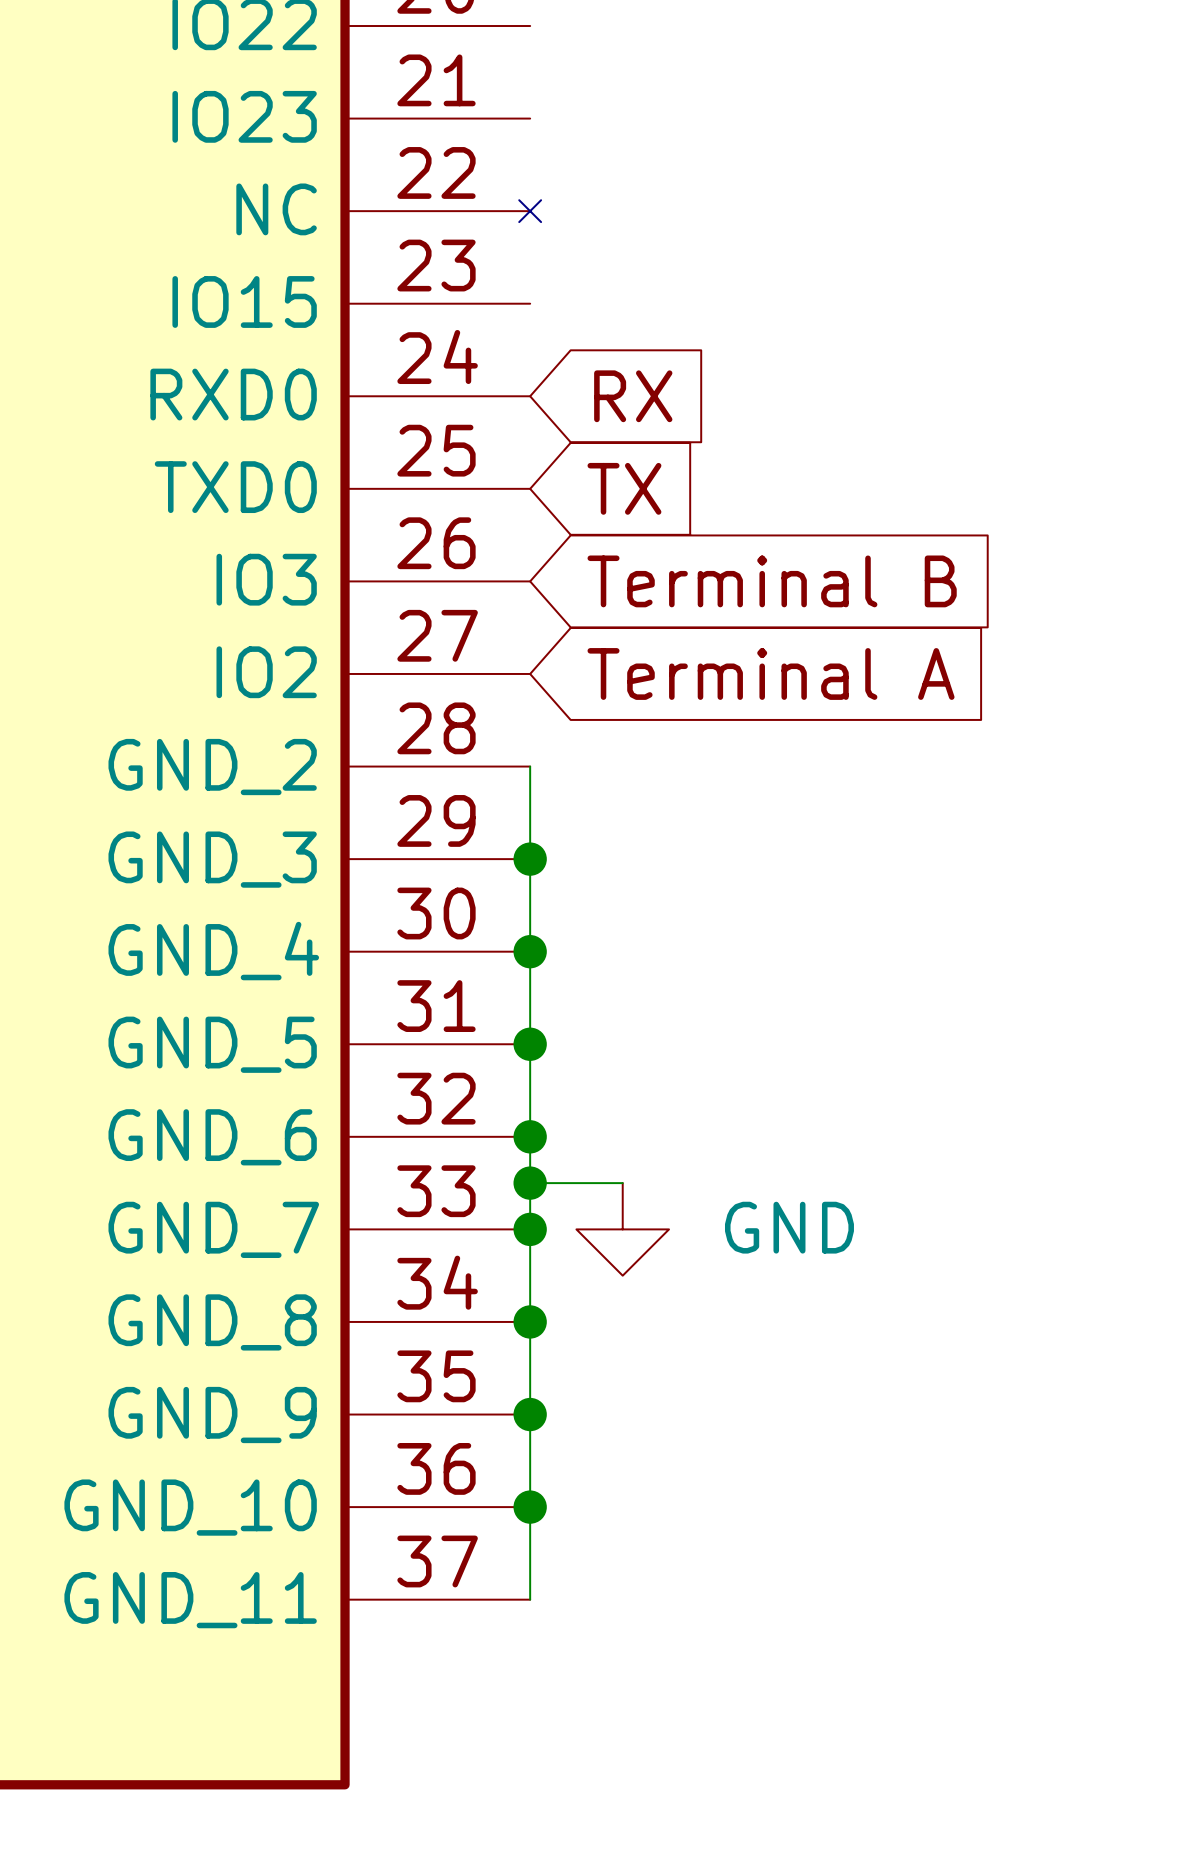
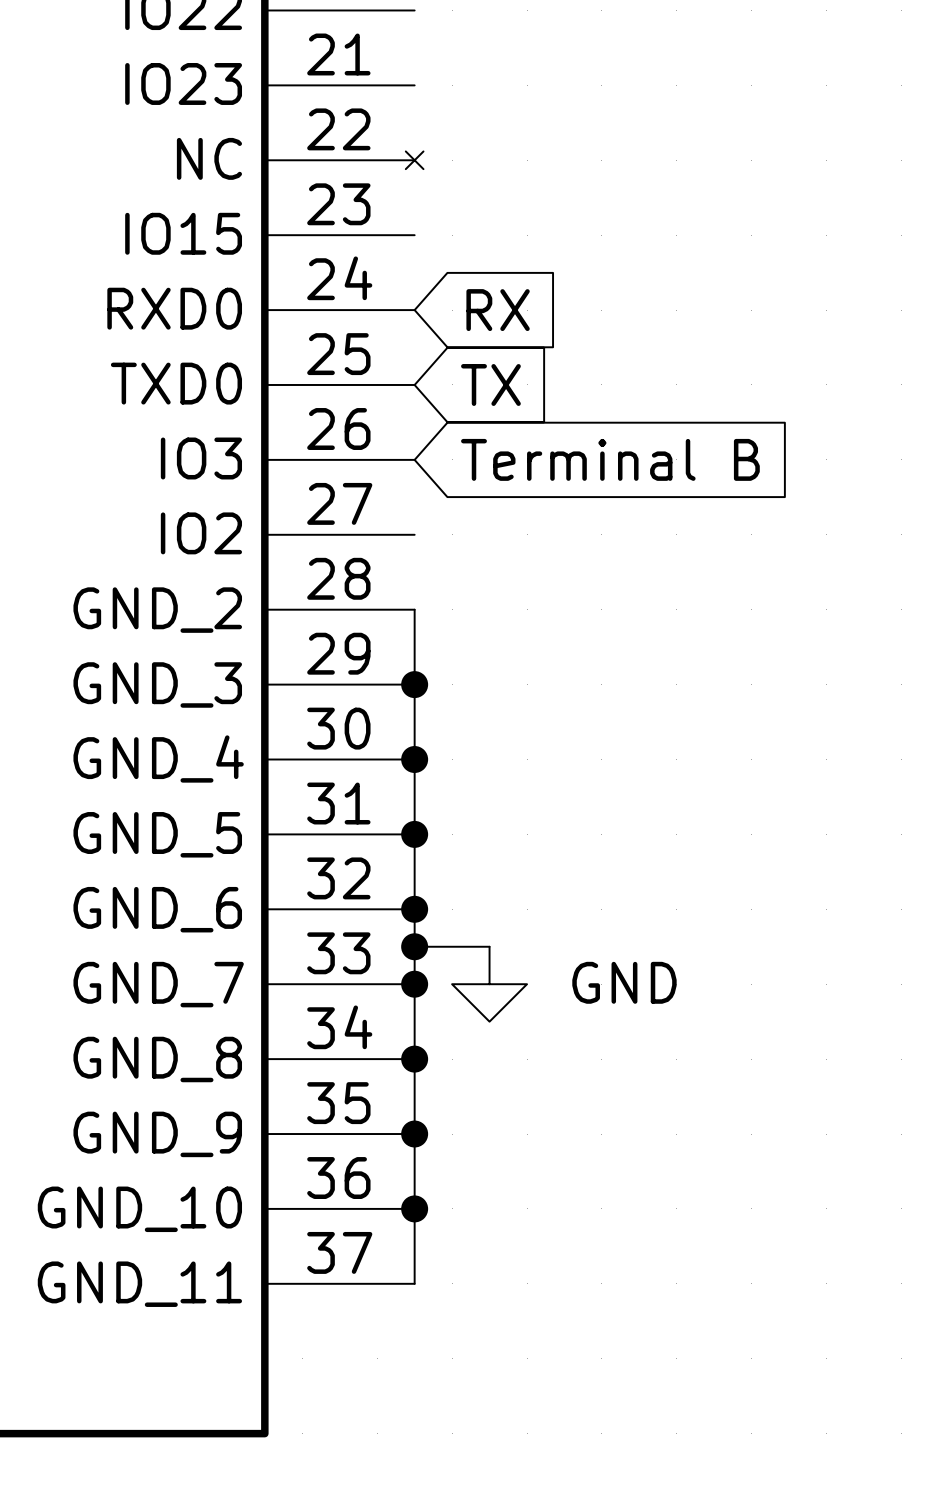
global label: Terminal A (771, 673) -> none

